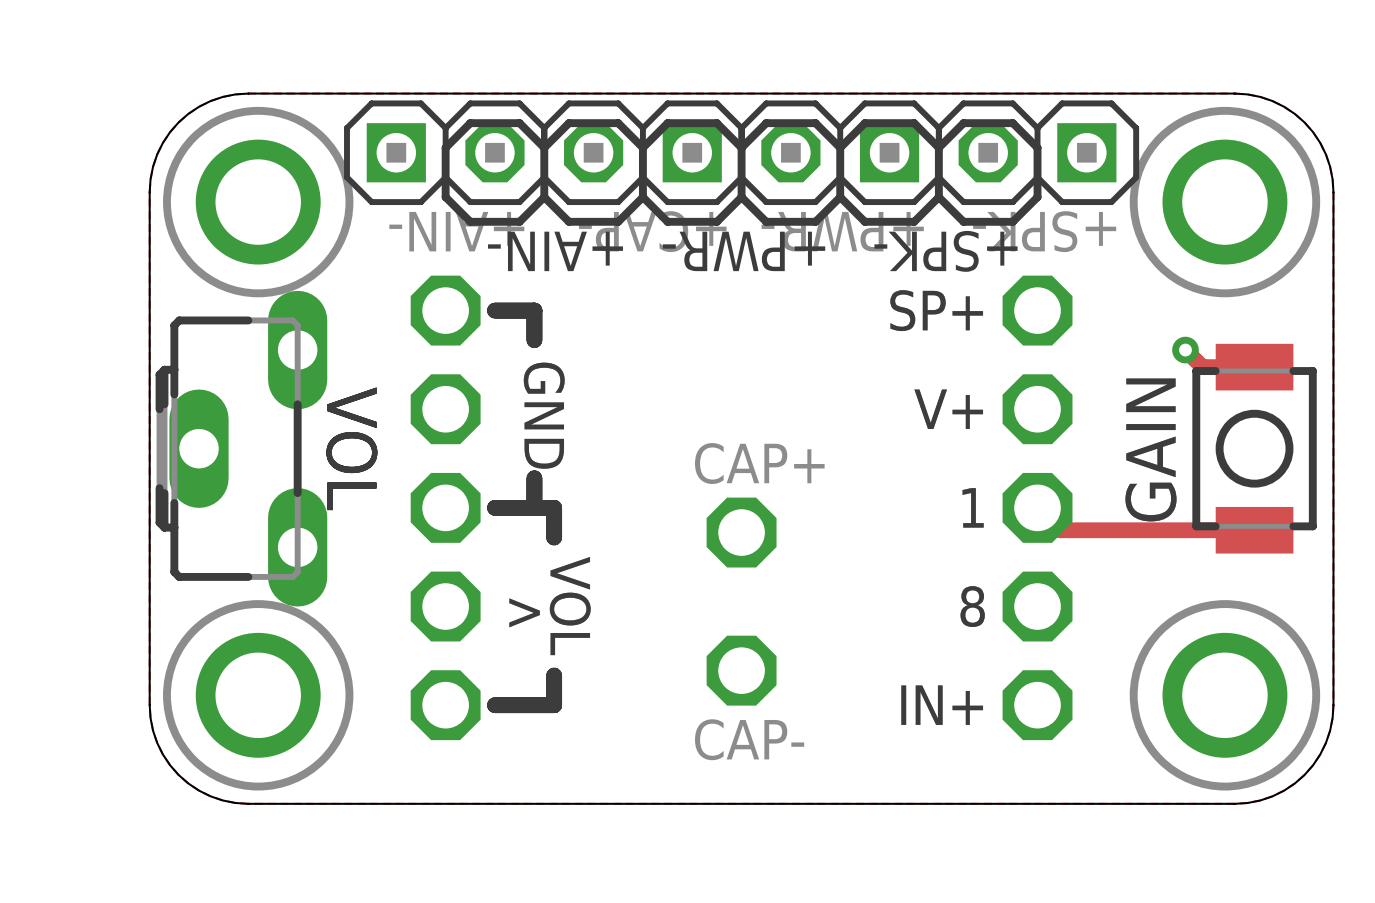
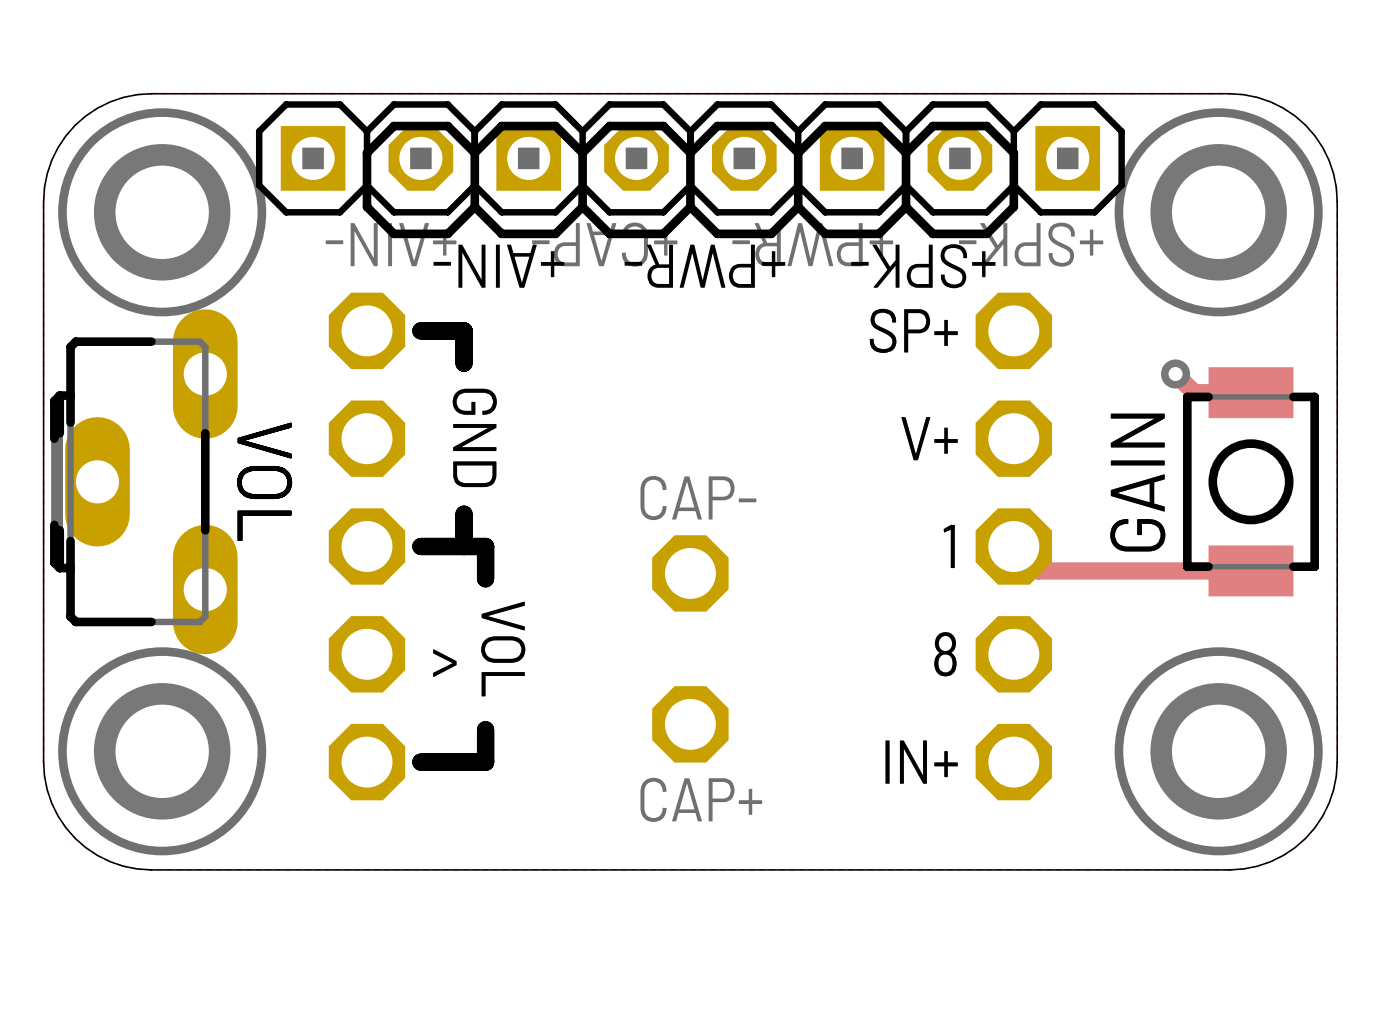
part rotation: 0° (642, 152) -> 180° (582, 158)
part value: CAP+ (759, 463) -> CAP- (698, 498)
part value: CAP- (749, 739) -> CAP+ (701, 799)

